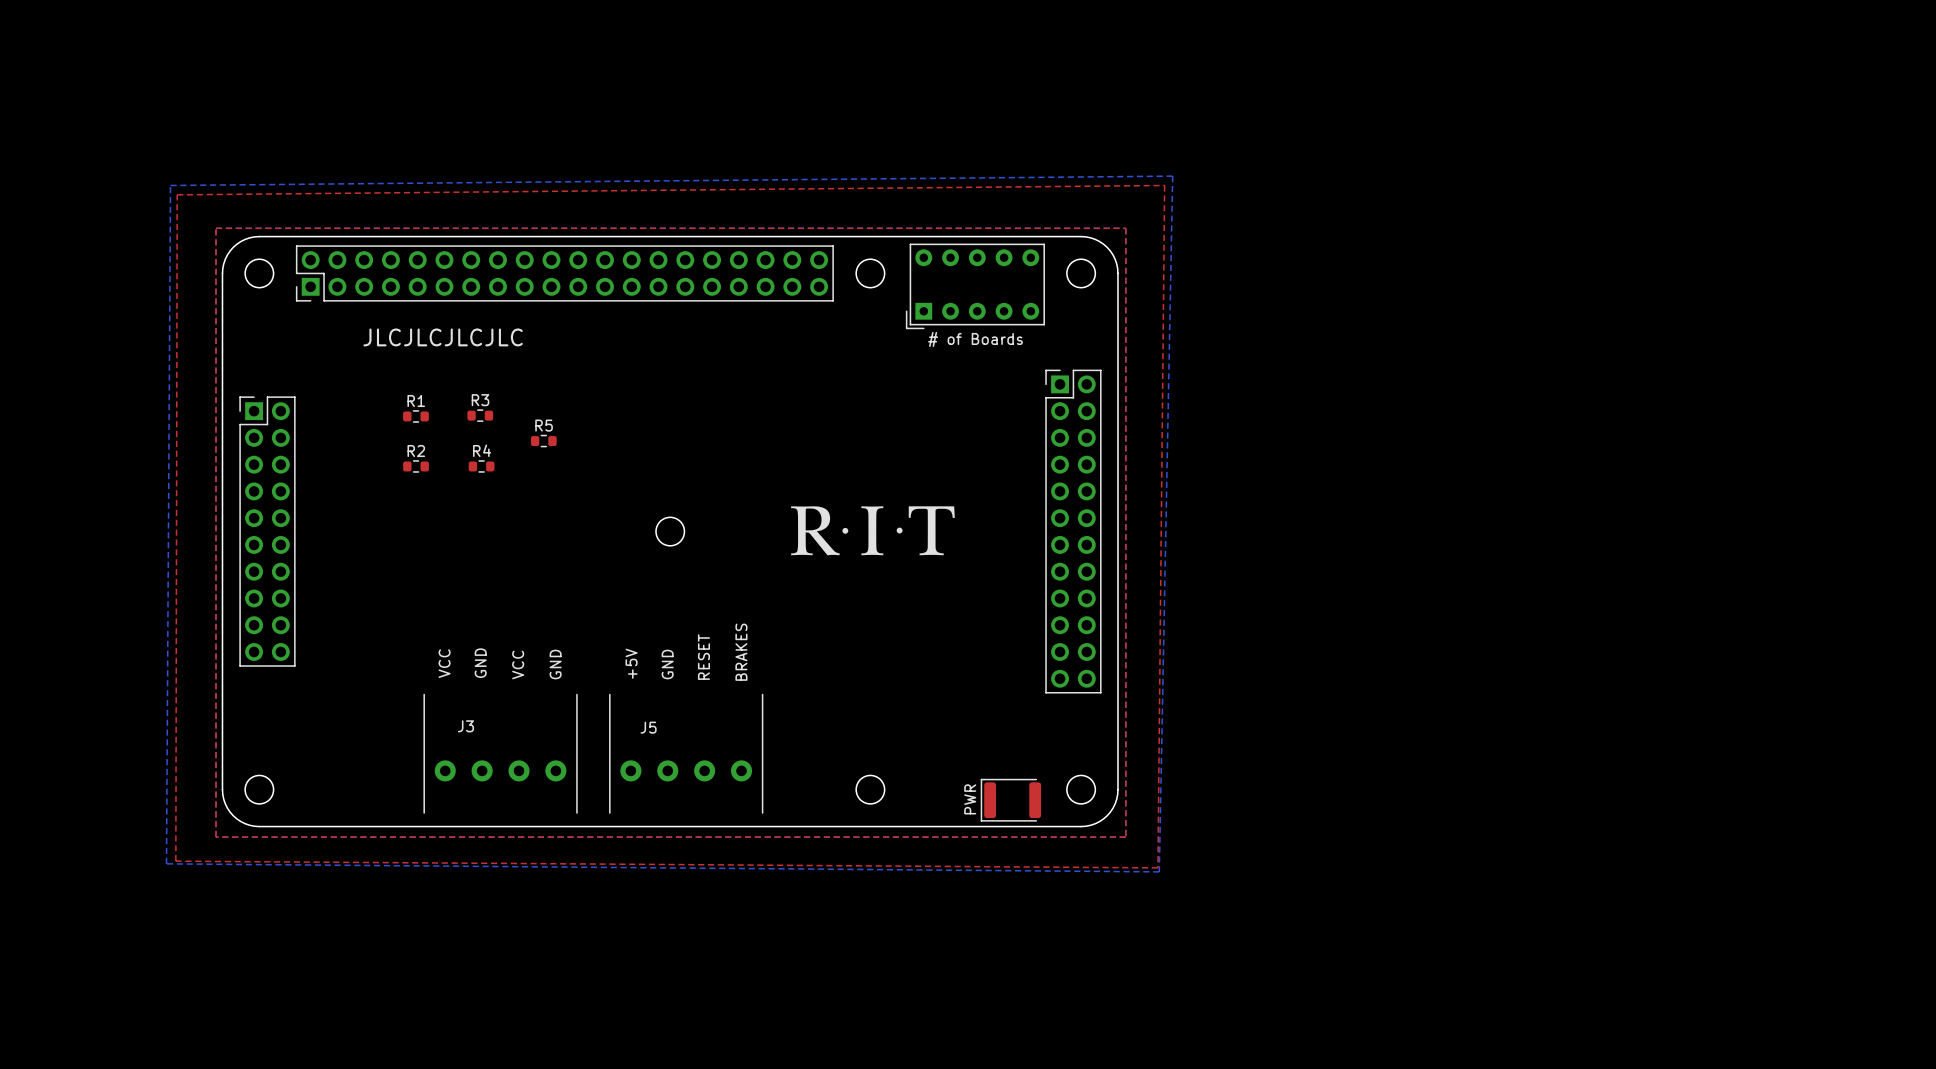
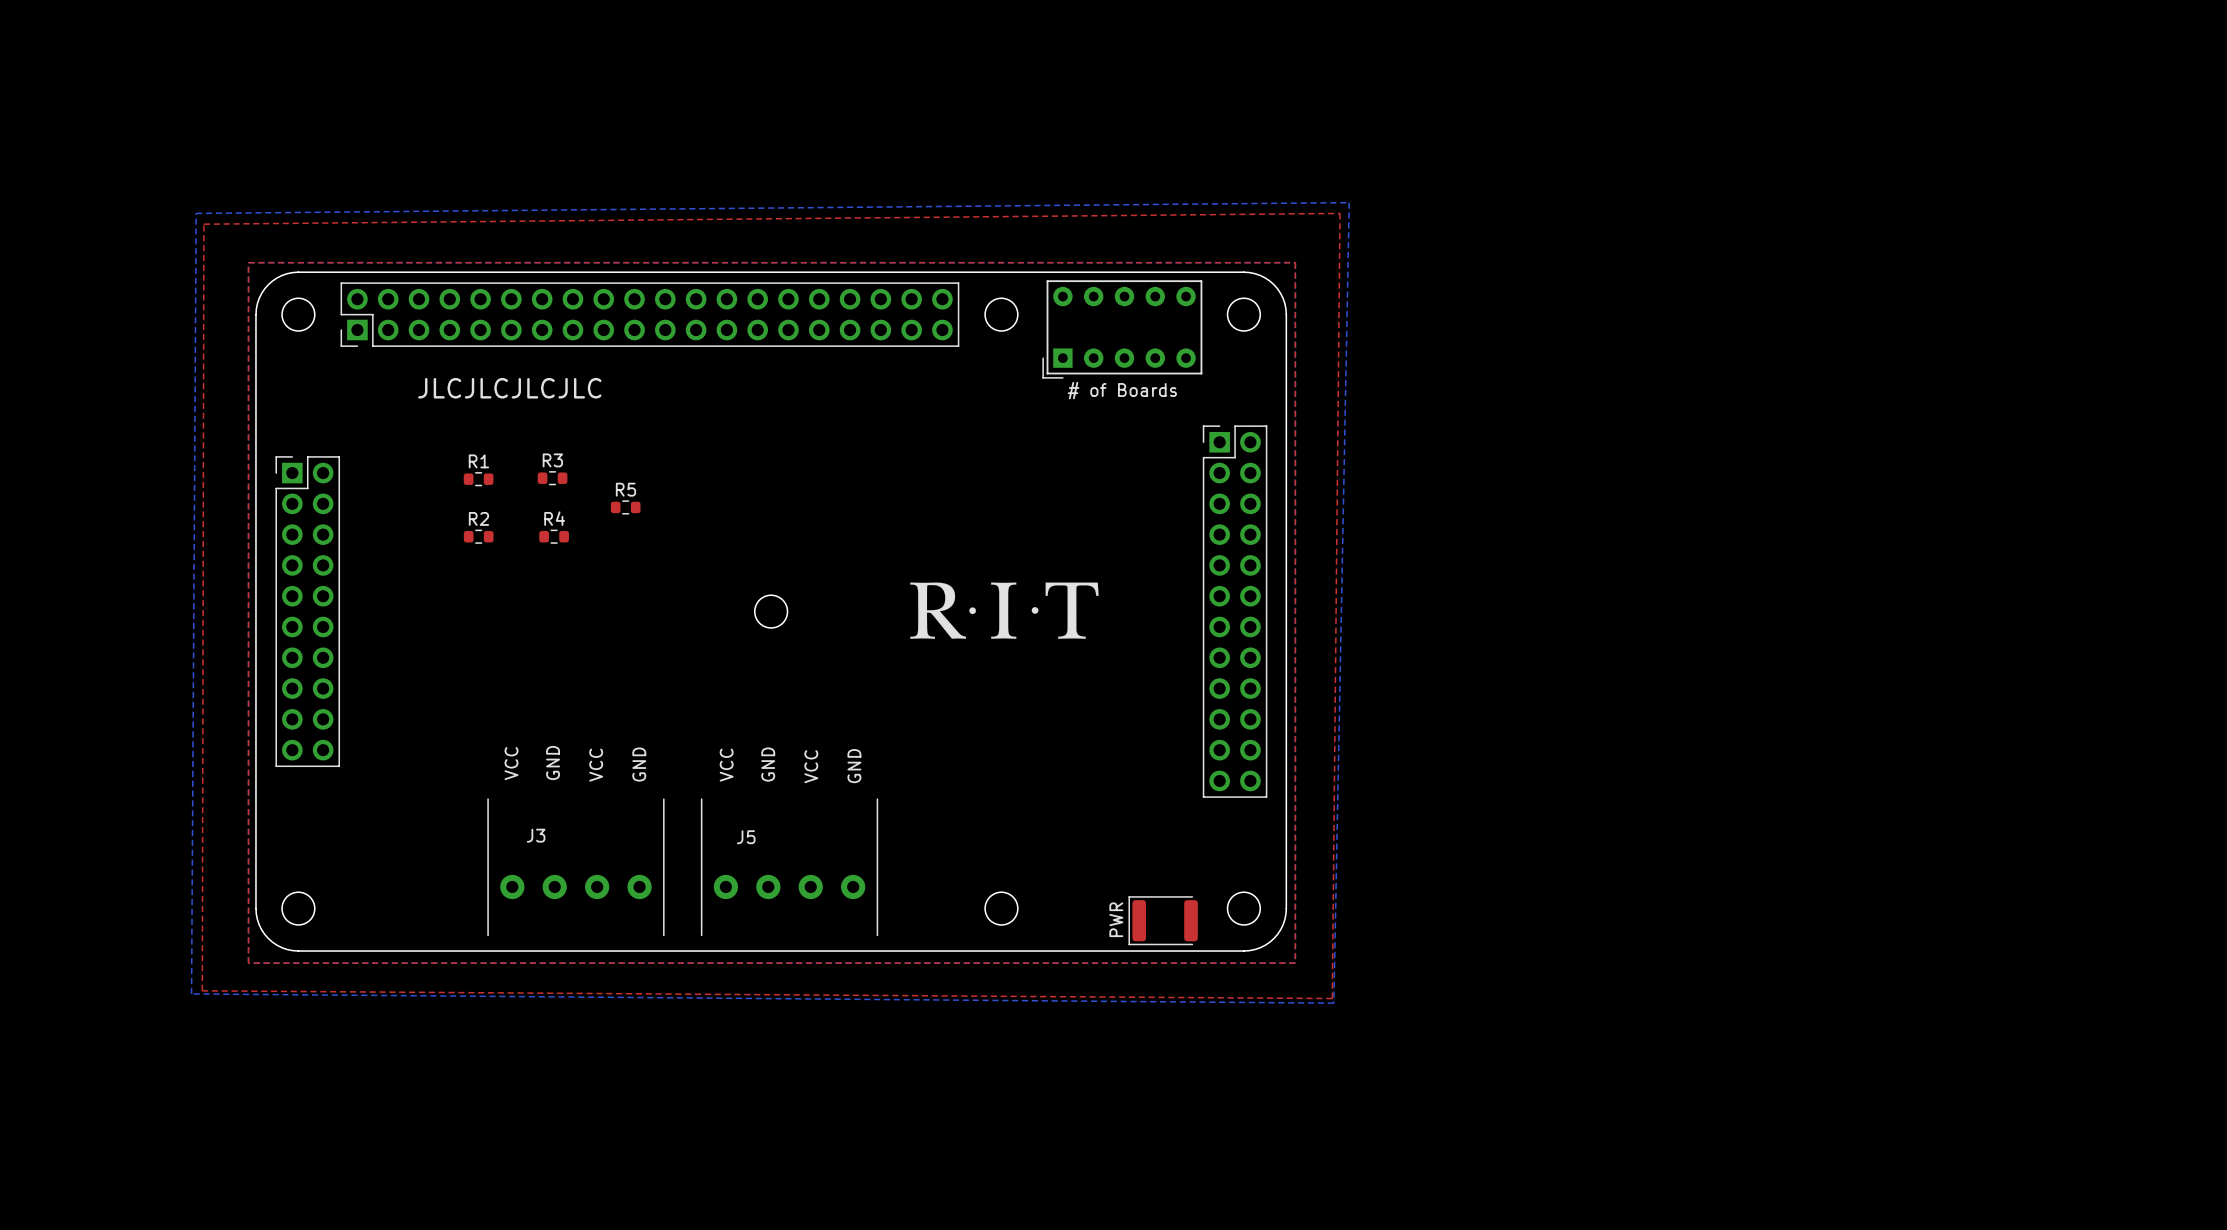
text: BRAKES (741, 652) -> none
text: RESET (703, 657) -> VCC (811, 766)
text: +5V (631, 663) -> VCC (726, 765)
text: none -> GND (854, 766)

